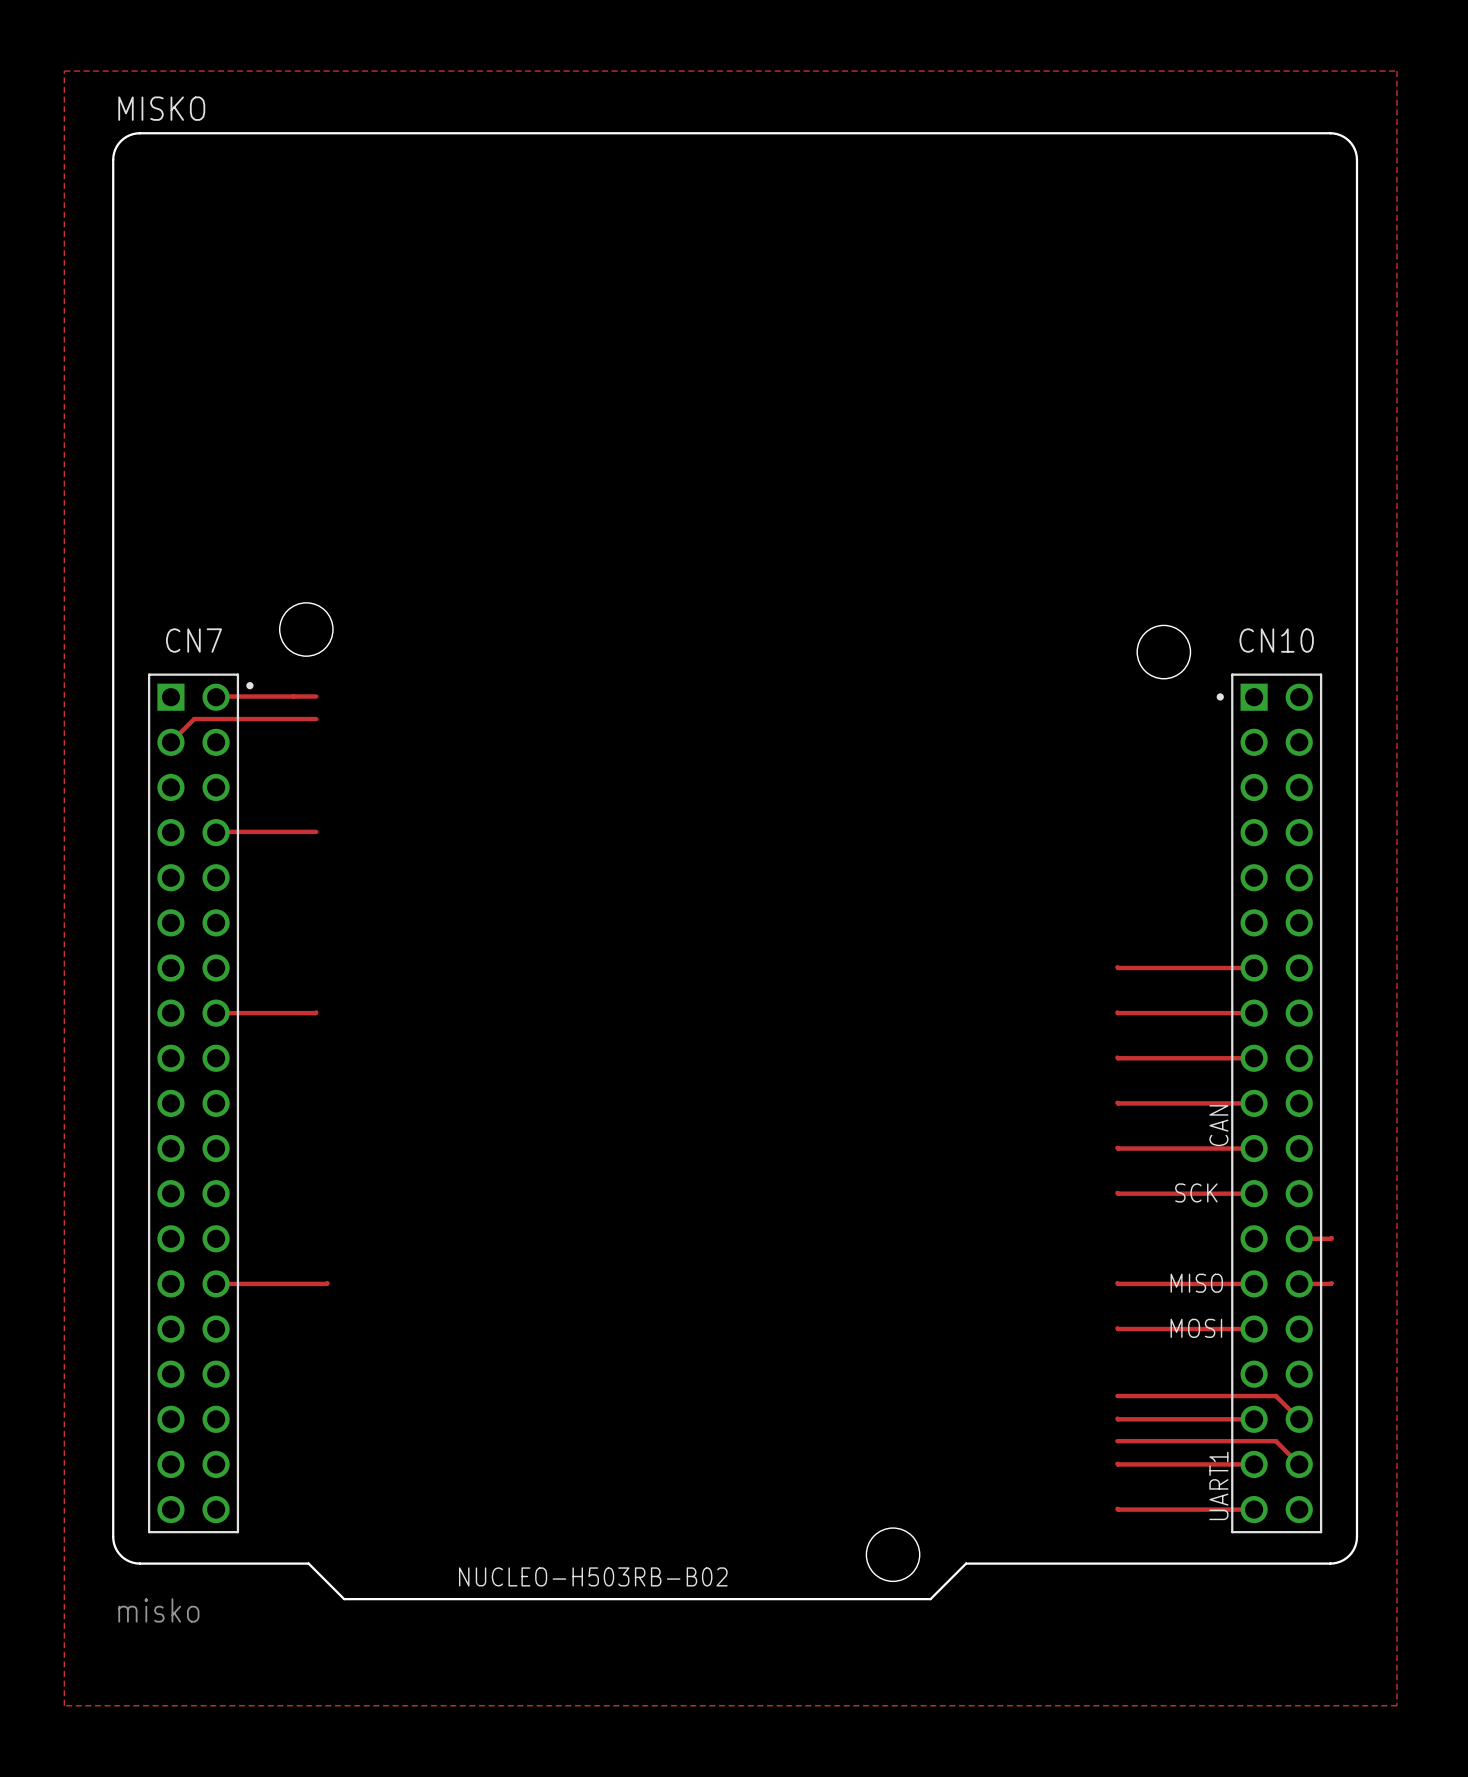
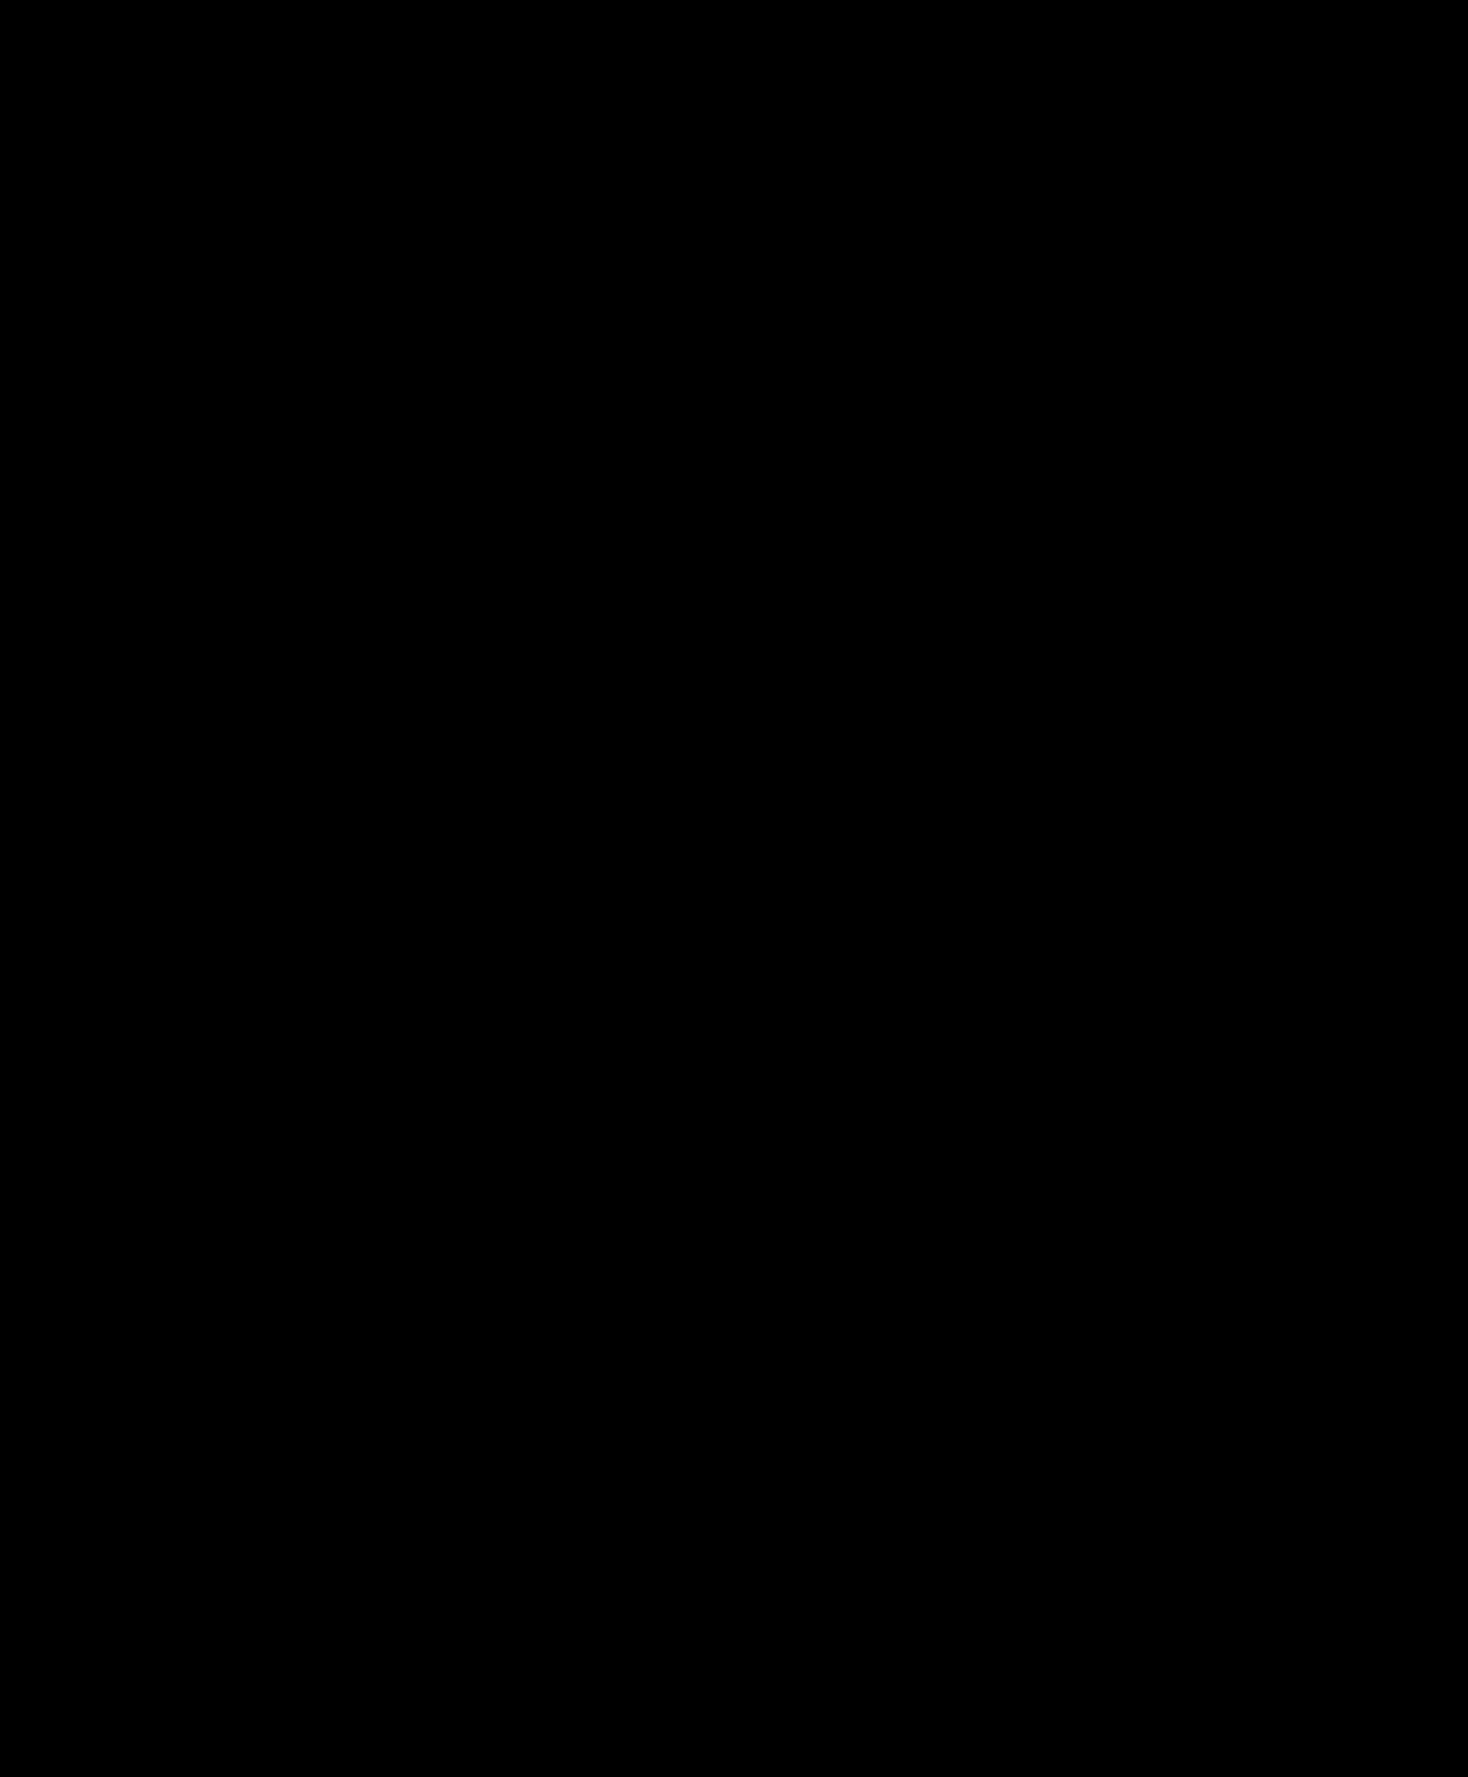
zone outline: (64, 71) (1396, 71) (1396, 1705) (64, 1705) (64, 71) -> none
track: (316, 696) (216, 697) -> none
track: (316, 719) (194, 719) (170, 742) -> none
track: (316, 831) (216, 832) -> none
MISKO: misko (735, 866) -> none
track: (1117, 967) (1254, 968) -> none
track: (316, 1012) (216, 1013) -> none
track: (1117, 1012) (1254, 1013) -> none
track: (1117, 1057) (1254, 1058) -> none
track: (1117, 1102) (1254, 1103) -> none
text: CAN (1218, 1125) -> none
track: (1117, 1147) (1254, 1148) -> none
track: (1117, 1192) (1254, 1193) -> none
text: SCK (1196, 1192) -> none
track: (1331, 1238) (1299, 1238) -> none
track: (327, 1283) (216, 1283) -> none
track: (1117, 1283) (1254, 1283) -> none
text: MISO (1196, 1283) -> none
track: (1331, 1283) (1299, 1283) -> none
track: (1117, 1328) (1254, 1329) -> none
text: MOSI (1196, 1328) -> none
track: (1117, 1396) (1275, 1396) (1299, 1419) -> none
track: (1117, 1418) (1254, 1419) -> none
track: (1117, 1441) (1275, 1441) (1299, 1464) -> none
track: (1117, 1463) (1254, 1464) -> none
text: UART1 (1218, 1485) -> none
track: (1117, 1508) (1254, 1509) -> none

